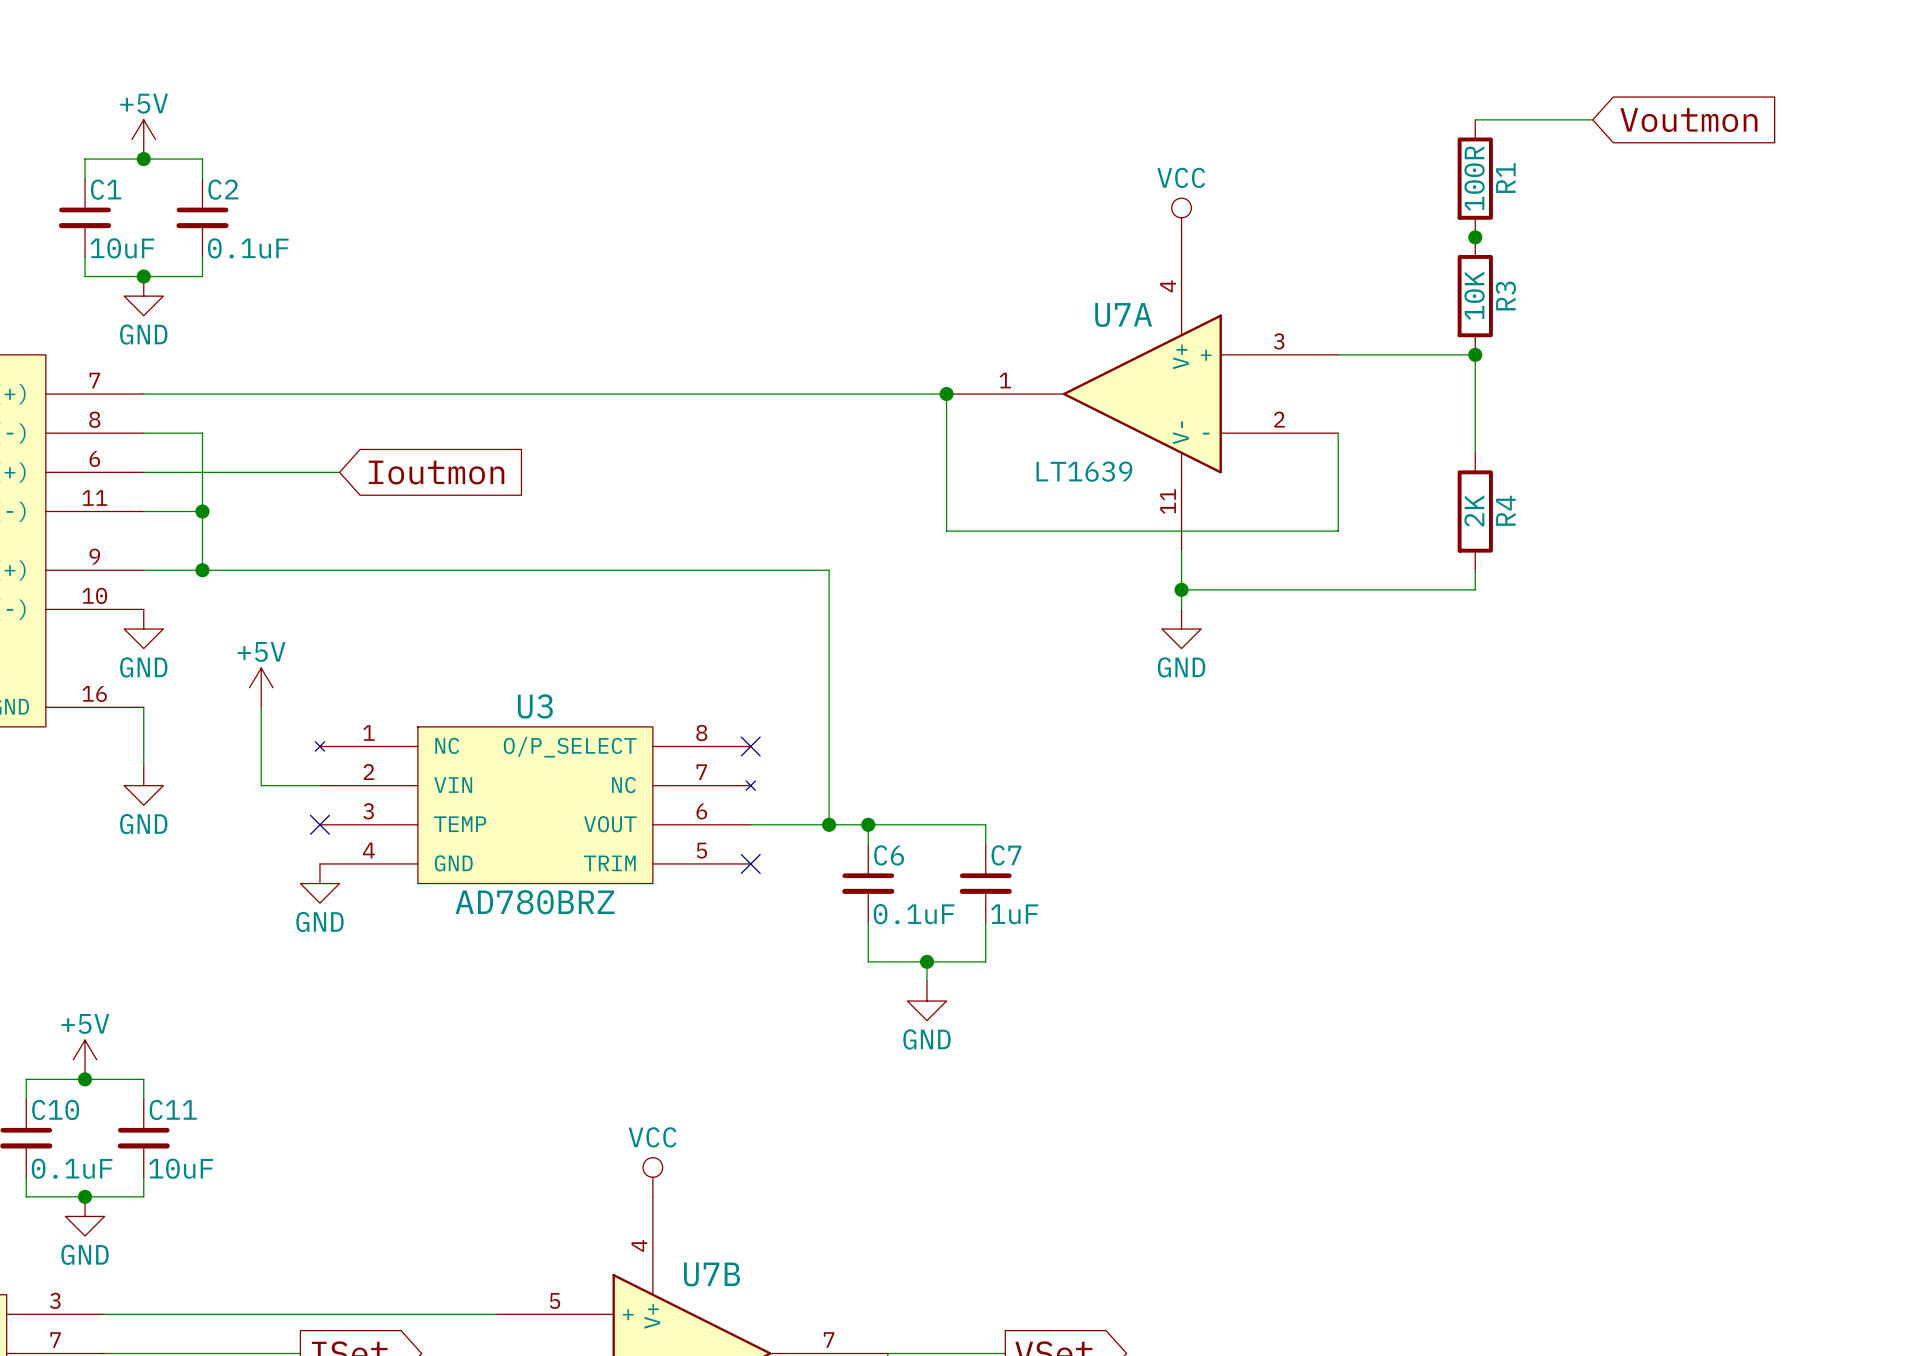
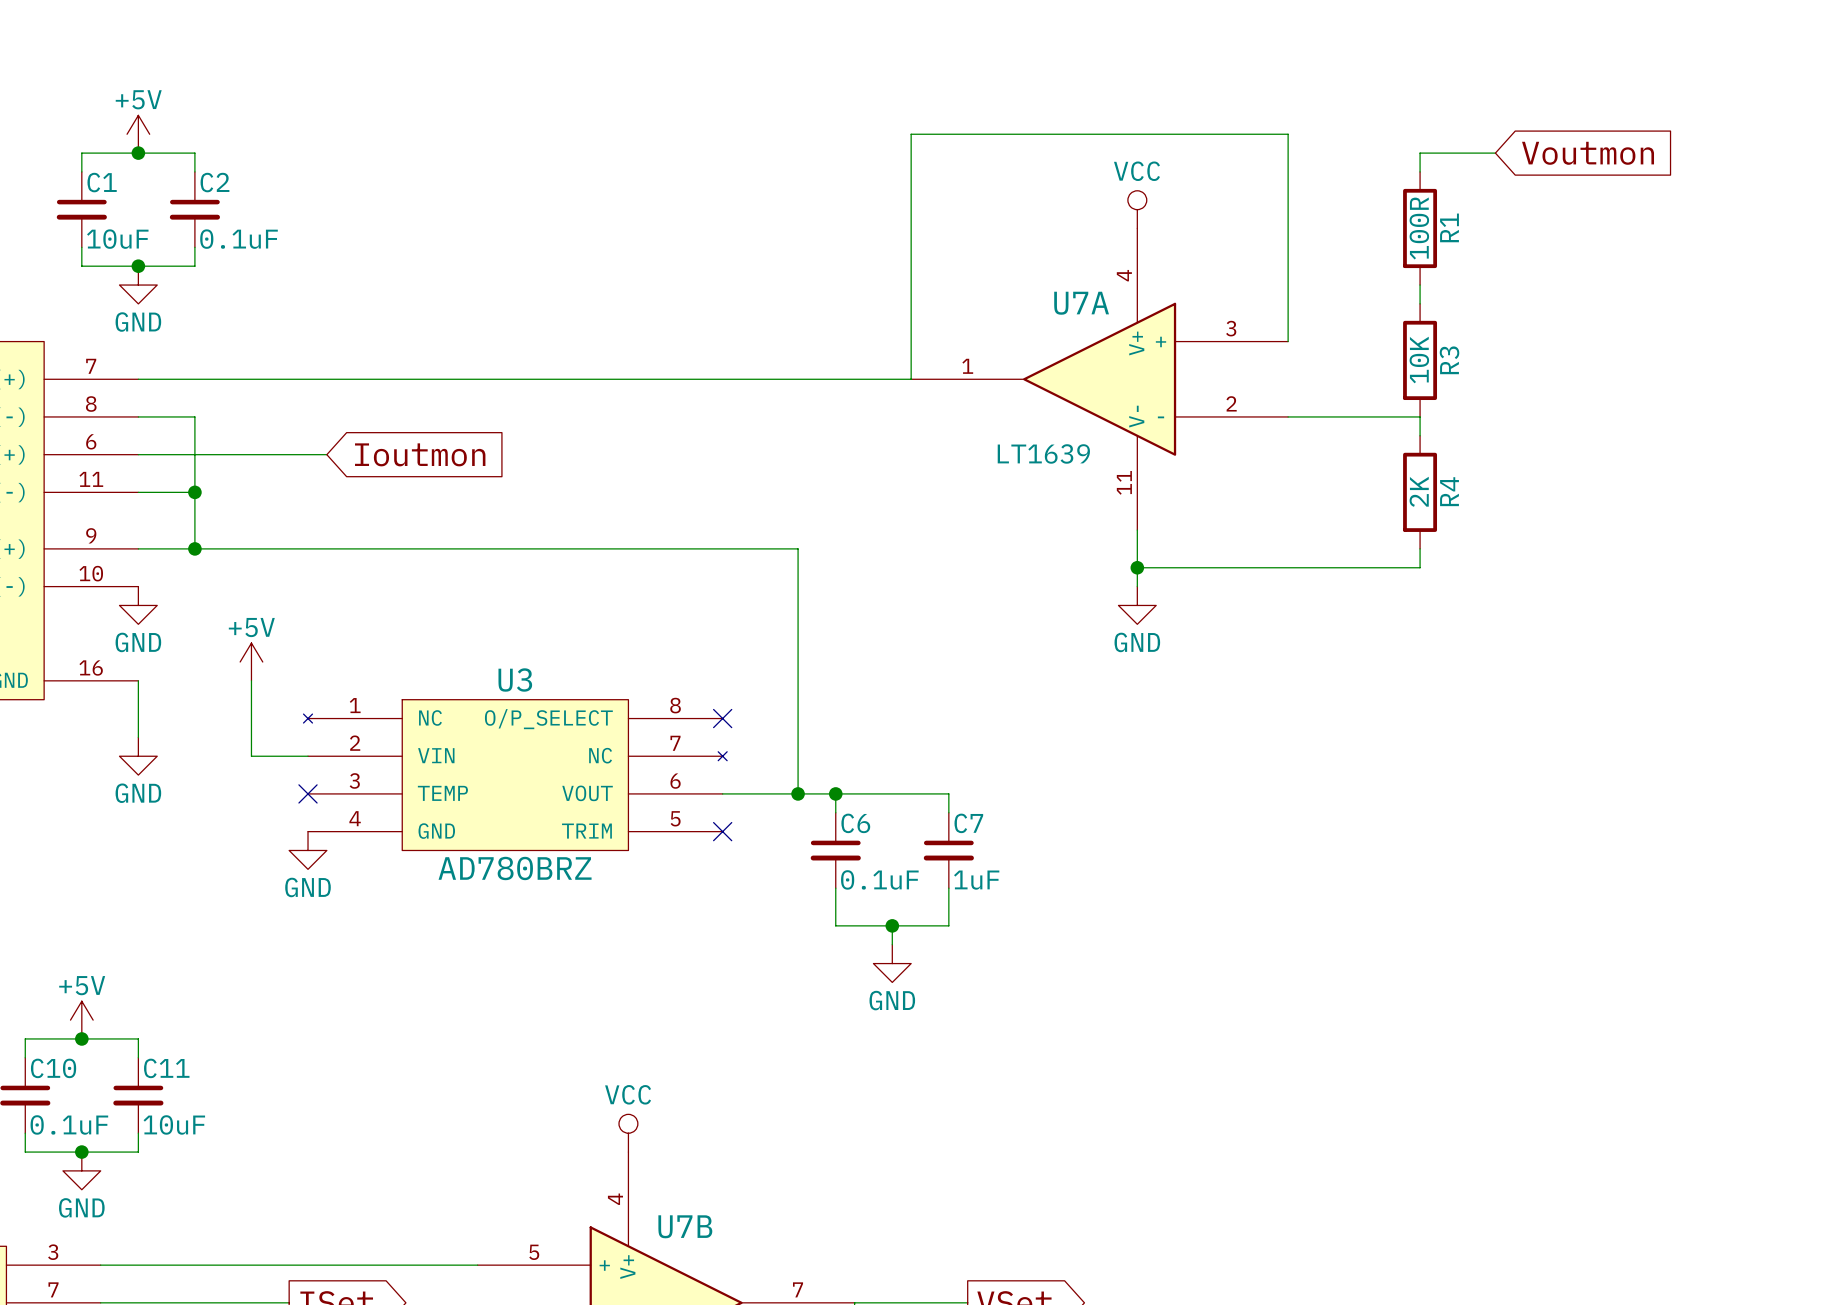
wire: (1475, 119) (1592, 119) -> none
global label position: Voutmon (1688, 120) -> Voutmon (1588, 153)
wire: none -> (1495, 153) (1420, 153) (1420, 171)
R1 position: (1475, 178) -> (1420, 228)
junction: (1475, 237) -> none
wire: none -> (1420, 285) (1420, 303)
R3 position: (1475, 296) -> (1420, 360)
wire: (1338, 354) (1475, 354) (1475, 433) -> (1288, 416) (1420, 416)
junction: (1475, 354) -> none
wire: (946, 394) (946, 531) (1338, 531) (1338, 433) -> (911, 379) (911, 134) (1288, 134) (1288, 341)
junction: (946, 394) -> none

